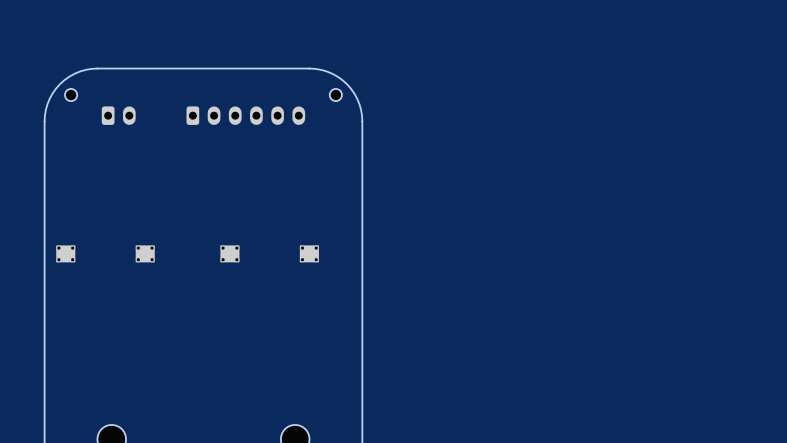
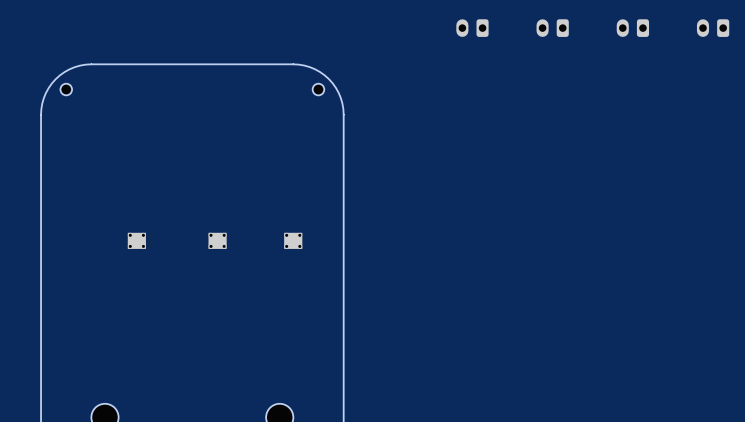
part: none -> (472, 28)
part: none -> (552, 28)
part: none -> (632, 28)
part: none -> (713, 28)
part: (118, 115) -> none
part: (245, 115) -> none
part: (65, 253) -> none

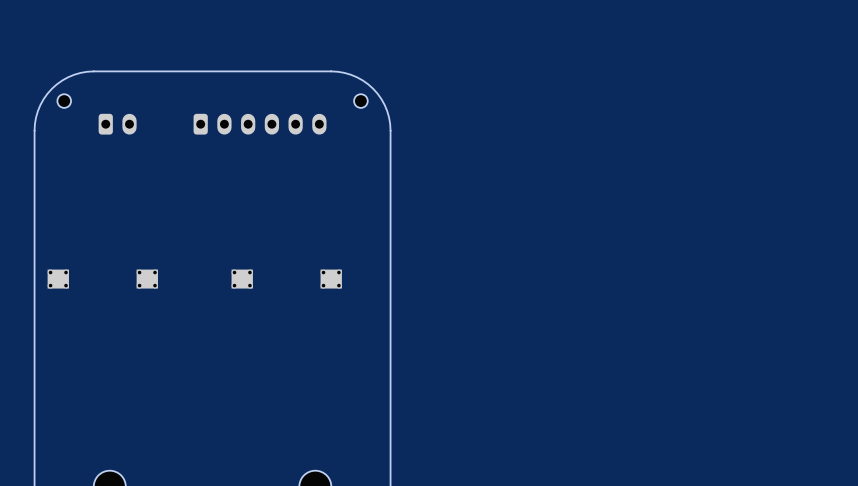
part: (472, 28) -> none
part: (552, 28) -> none
part: (632, 28) -> none
part: (713, 28) -> none
part: none -> (117, 124)
part: none -> (260, 124)
part: none -> (58, 279)

